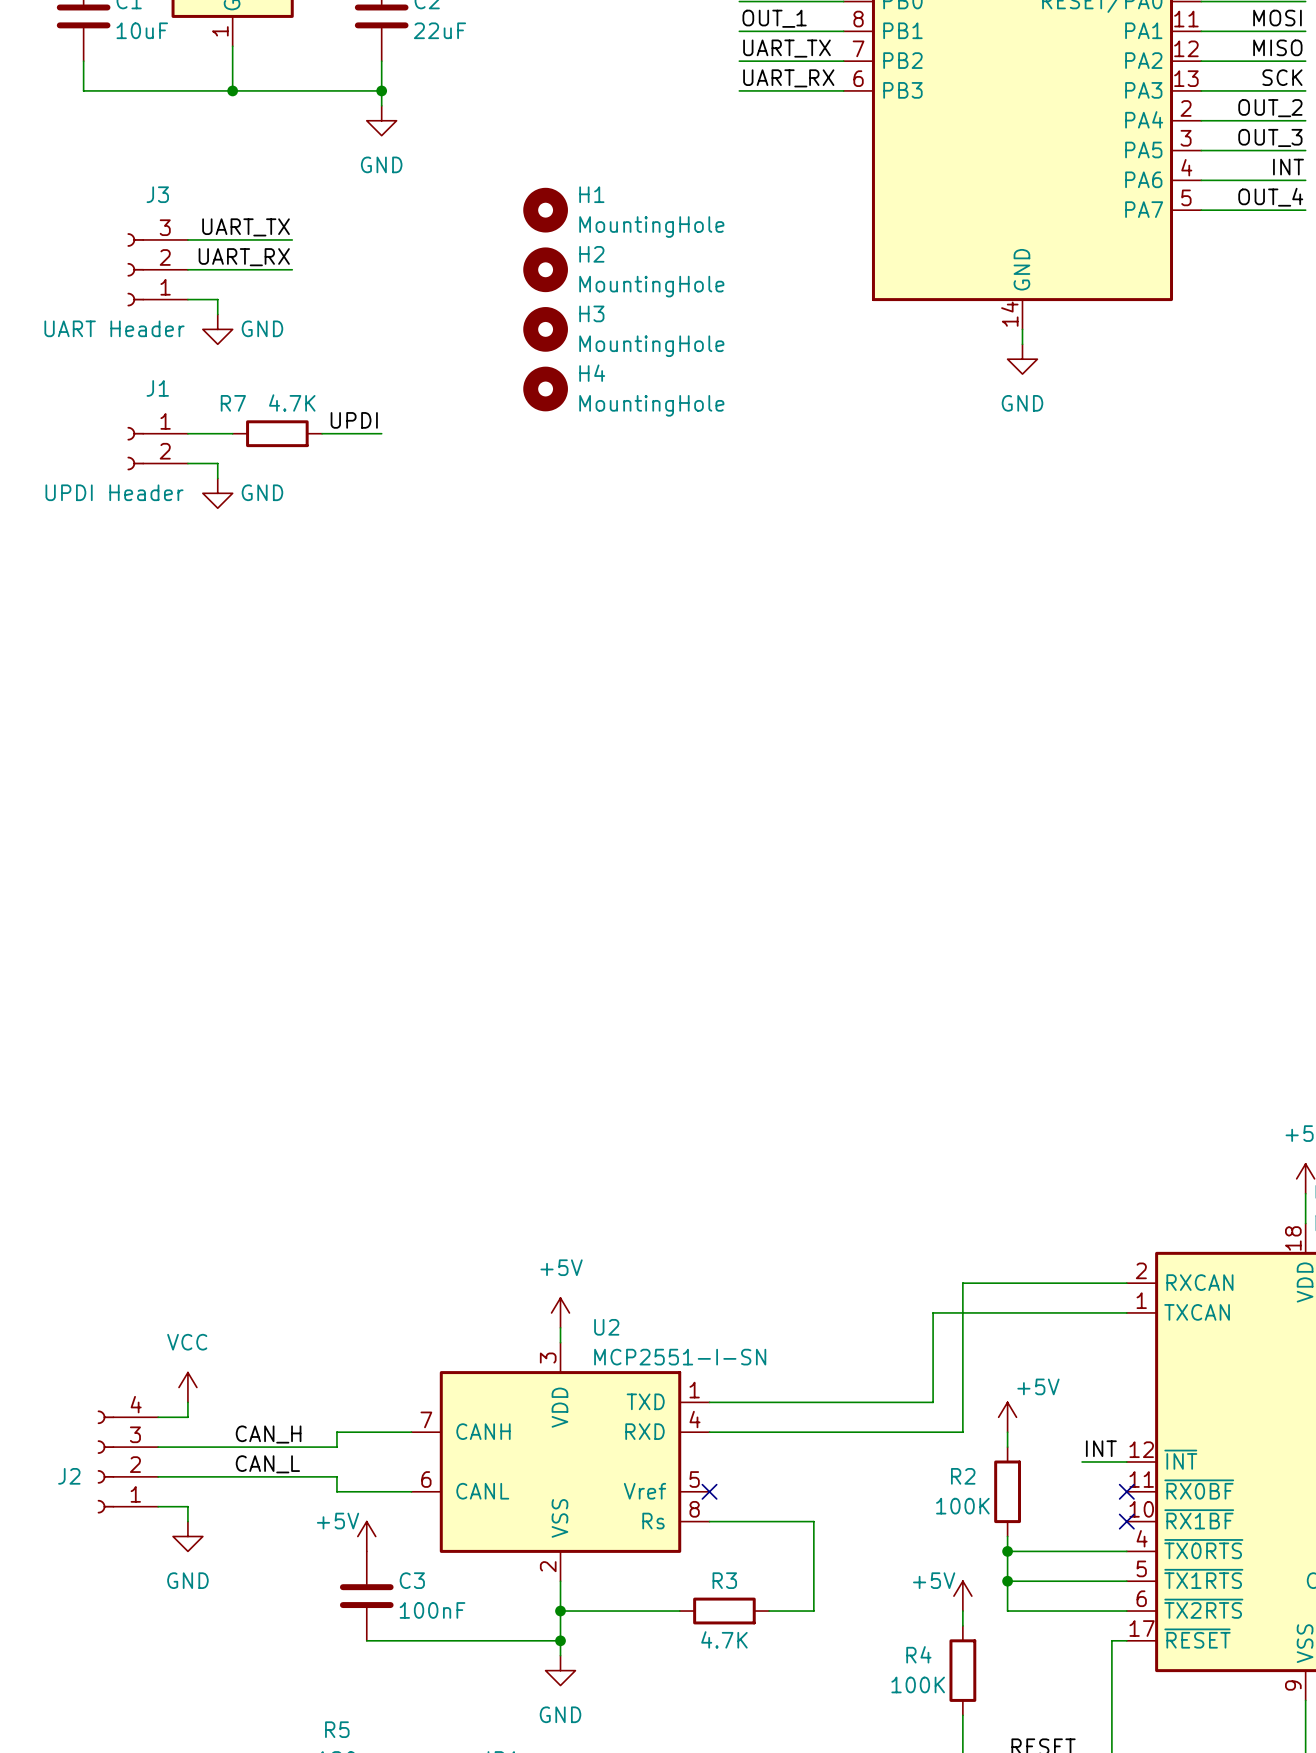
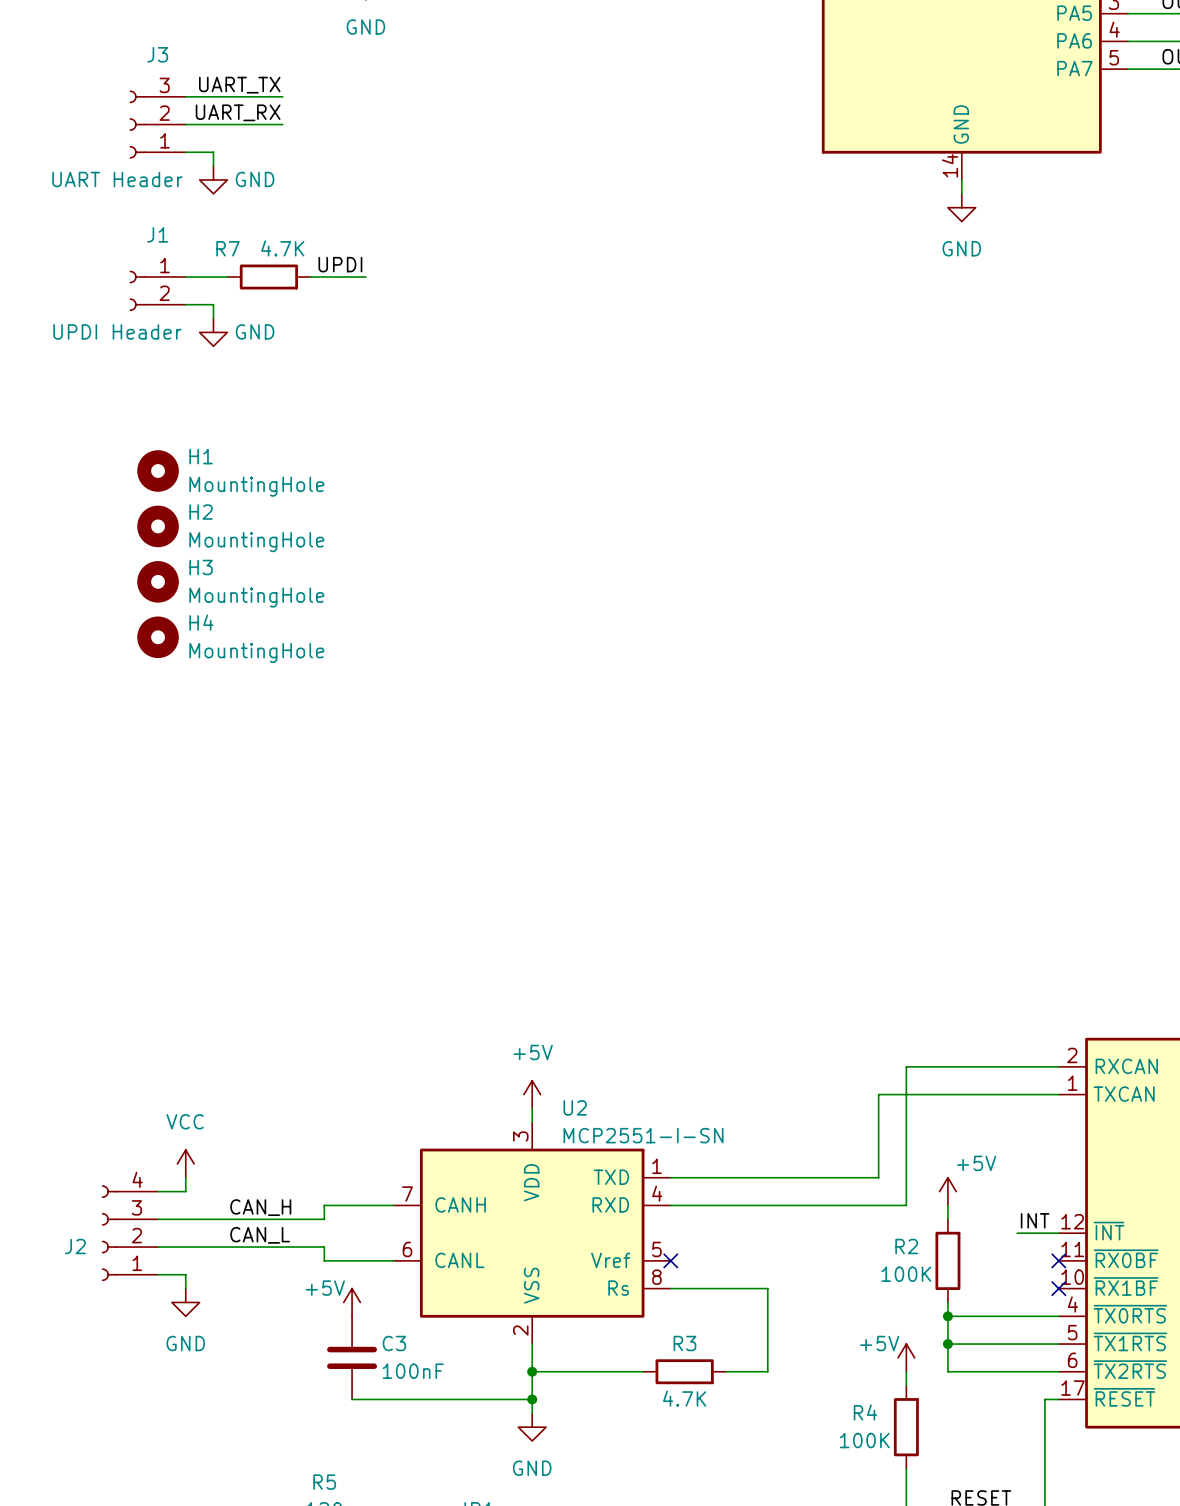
H1 position: (545, 210) -> (158, 471)
H2 position: (545, 269) -> (158, 526)
H3 position: (545, 329) -> (158, 581)
H4 position: (545, 389) -> (158, 637)

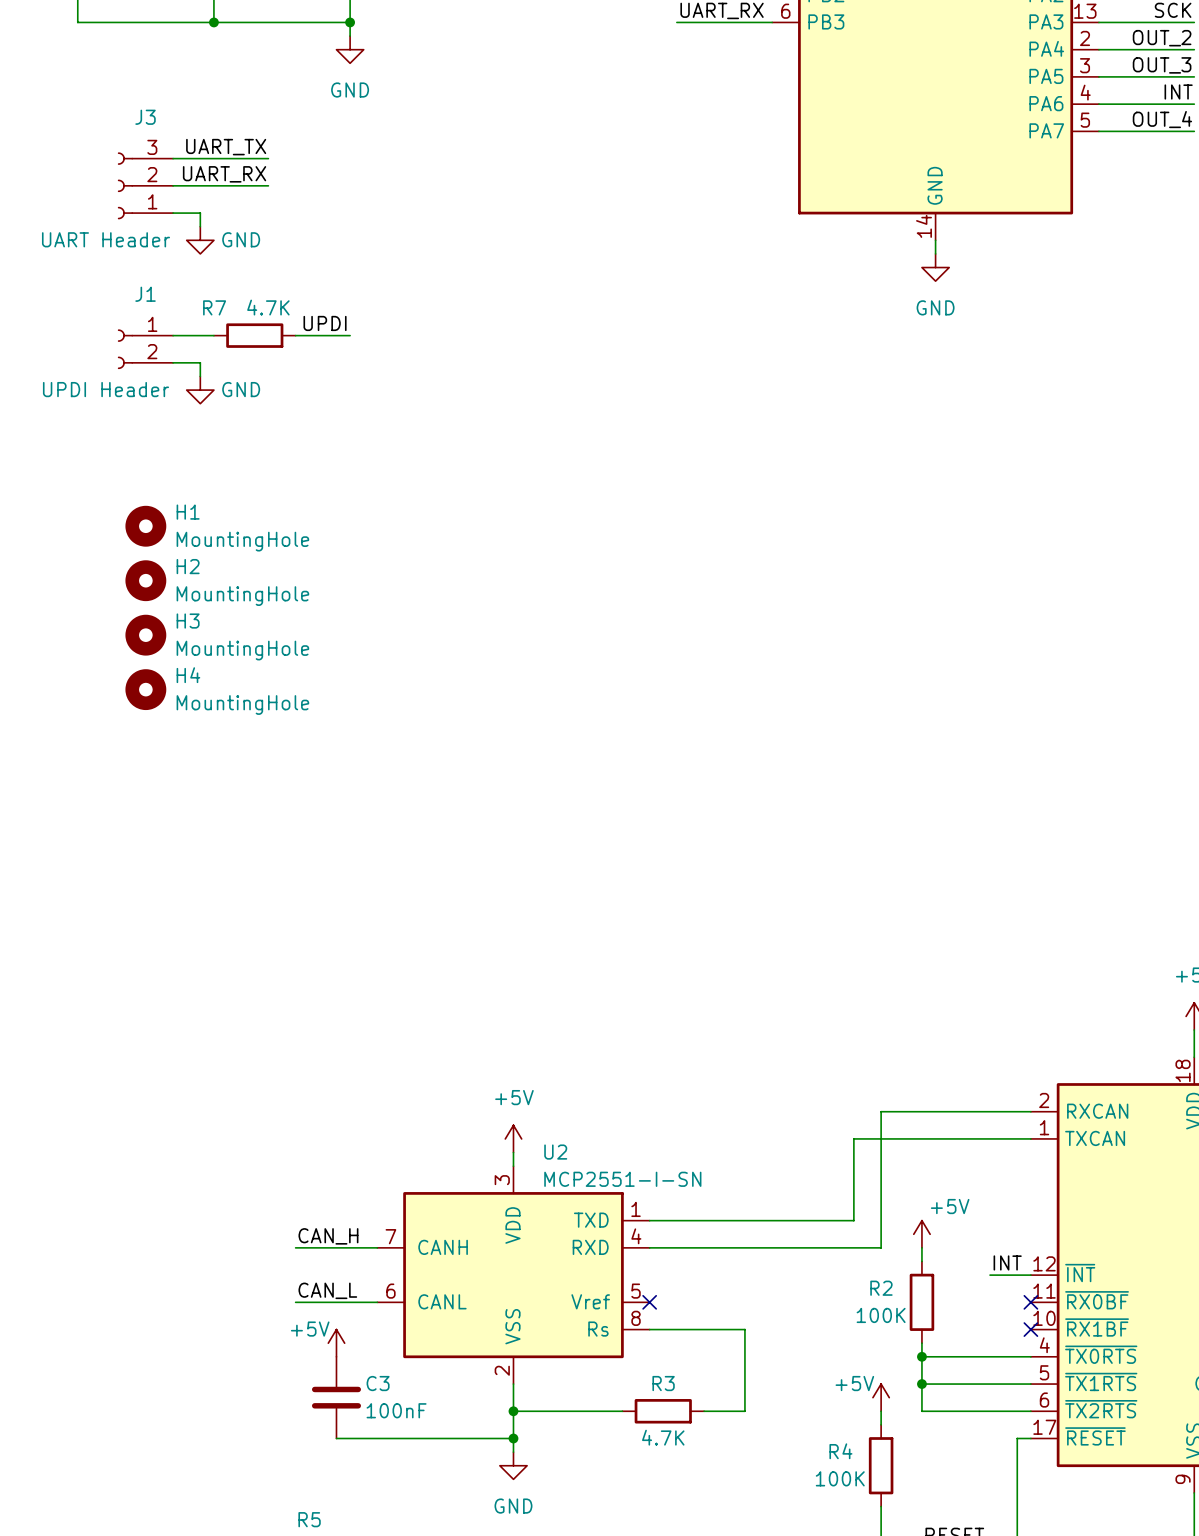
power symbol: VCC (185, 1163) -> none
wire: (185, 1177) (185, 1191) (158, 1191) -> none
wire: (324, 1205) (324, 1219) (158, 1219) -> (309, 1247) (295, 1247)
label position: CAN_H (260, 1207) -> CAN_H (328, 1236)
J2: (129, 1233) -> none
label position: CAN_L (260, 1235) -> CAN_L (327, 1290)
wire: (158, 1247) (324, 1247) (324, 1260) -> (295, 1302) (309, 1302)
wire: (158, 1274) (185, 1274) (185, 1288) -> none
power symbol: GND (185, 1302) -> none

